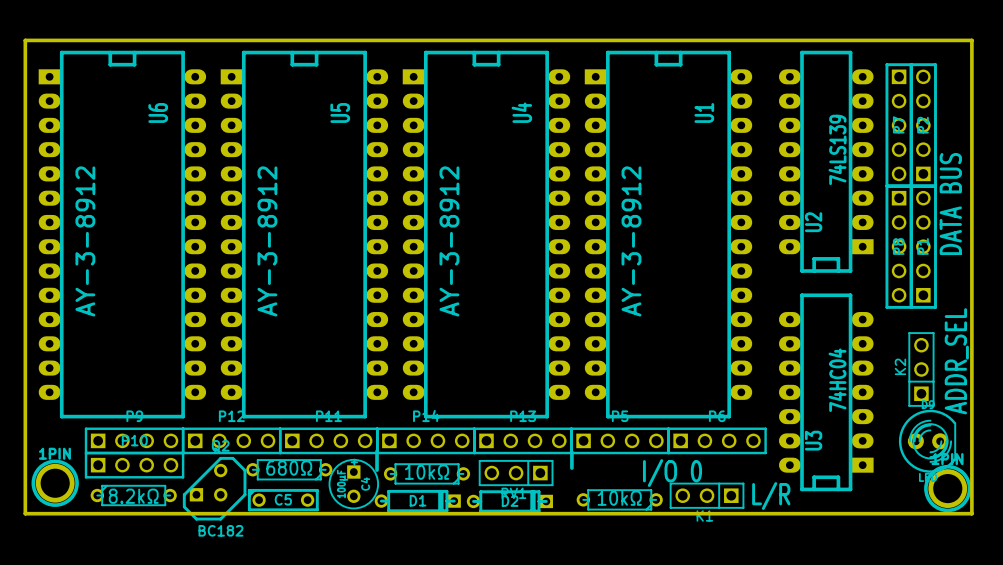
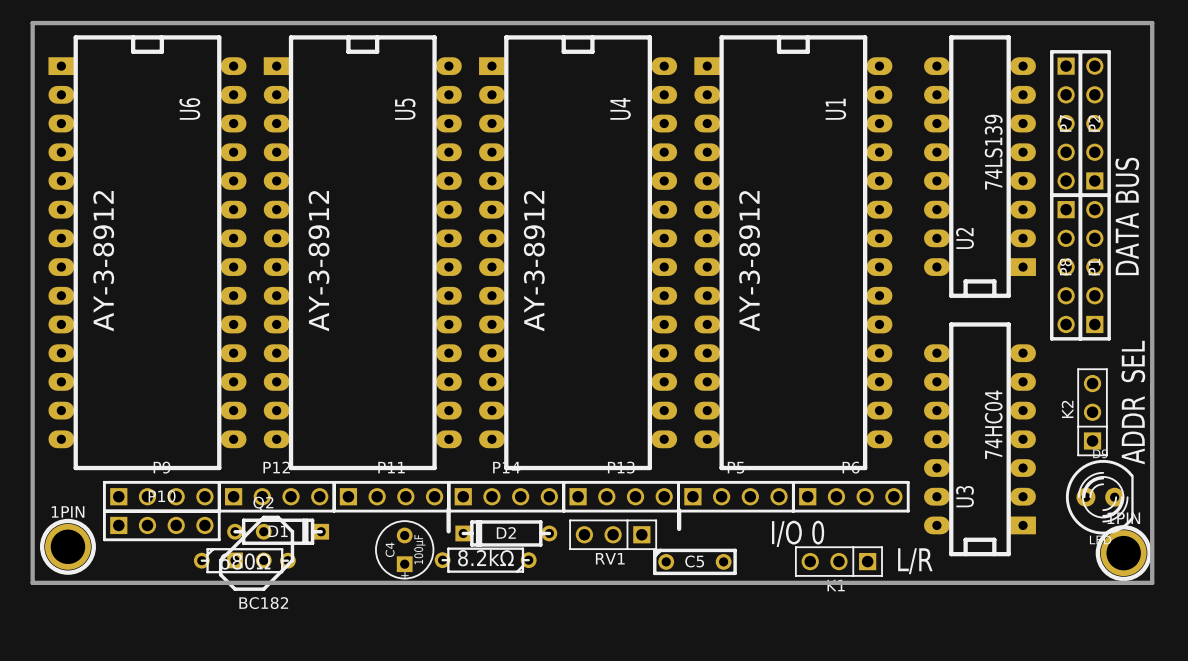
part rotation: 0° (289, 469) -> 180° (244, 560)
part position: (289, 469) -> (244, 560)
part: 10kΩ (427, 473) -> none
C4 rotation: 0° (353, 484) -> 180° (404, 549)
part: none -> 8.2kΩ (485, 560)
part: 8.2kΩ (133, 495) -> none
part: 10kΩ (619, 499) -> none
C5 position: (283, 500) -> (694, 561)
D1 position: (417, 501) -> (278, 531)
D2 rotation: 0° (509, 501) -> 180° (506, 533)
D2 position: (509, 501) -> (506, 533)

